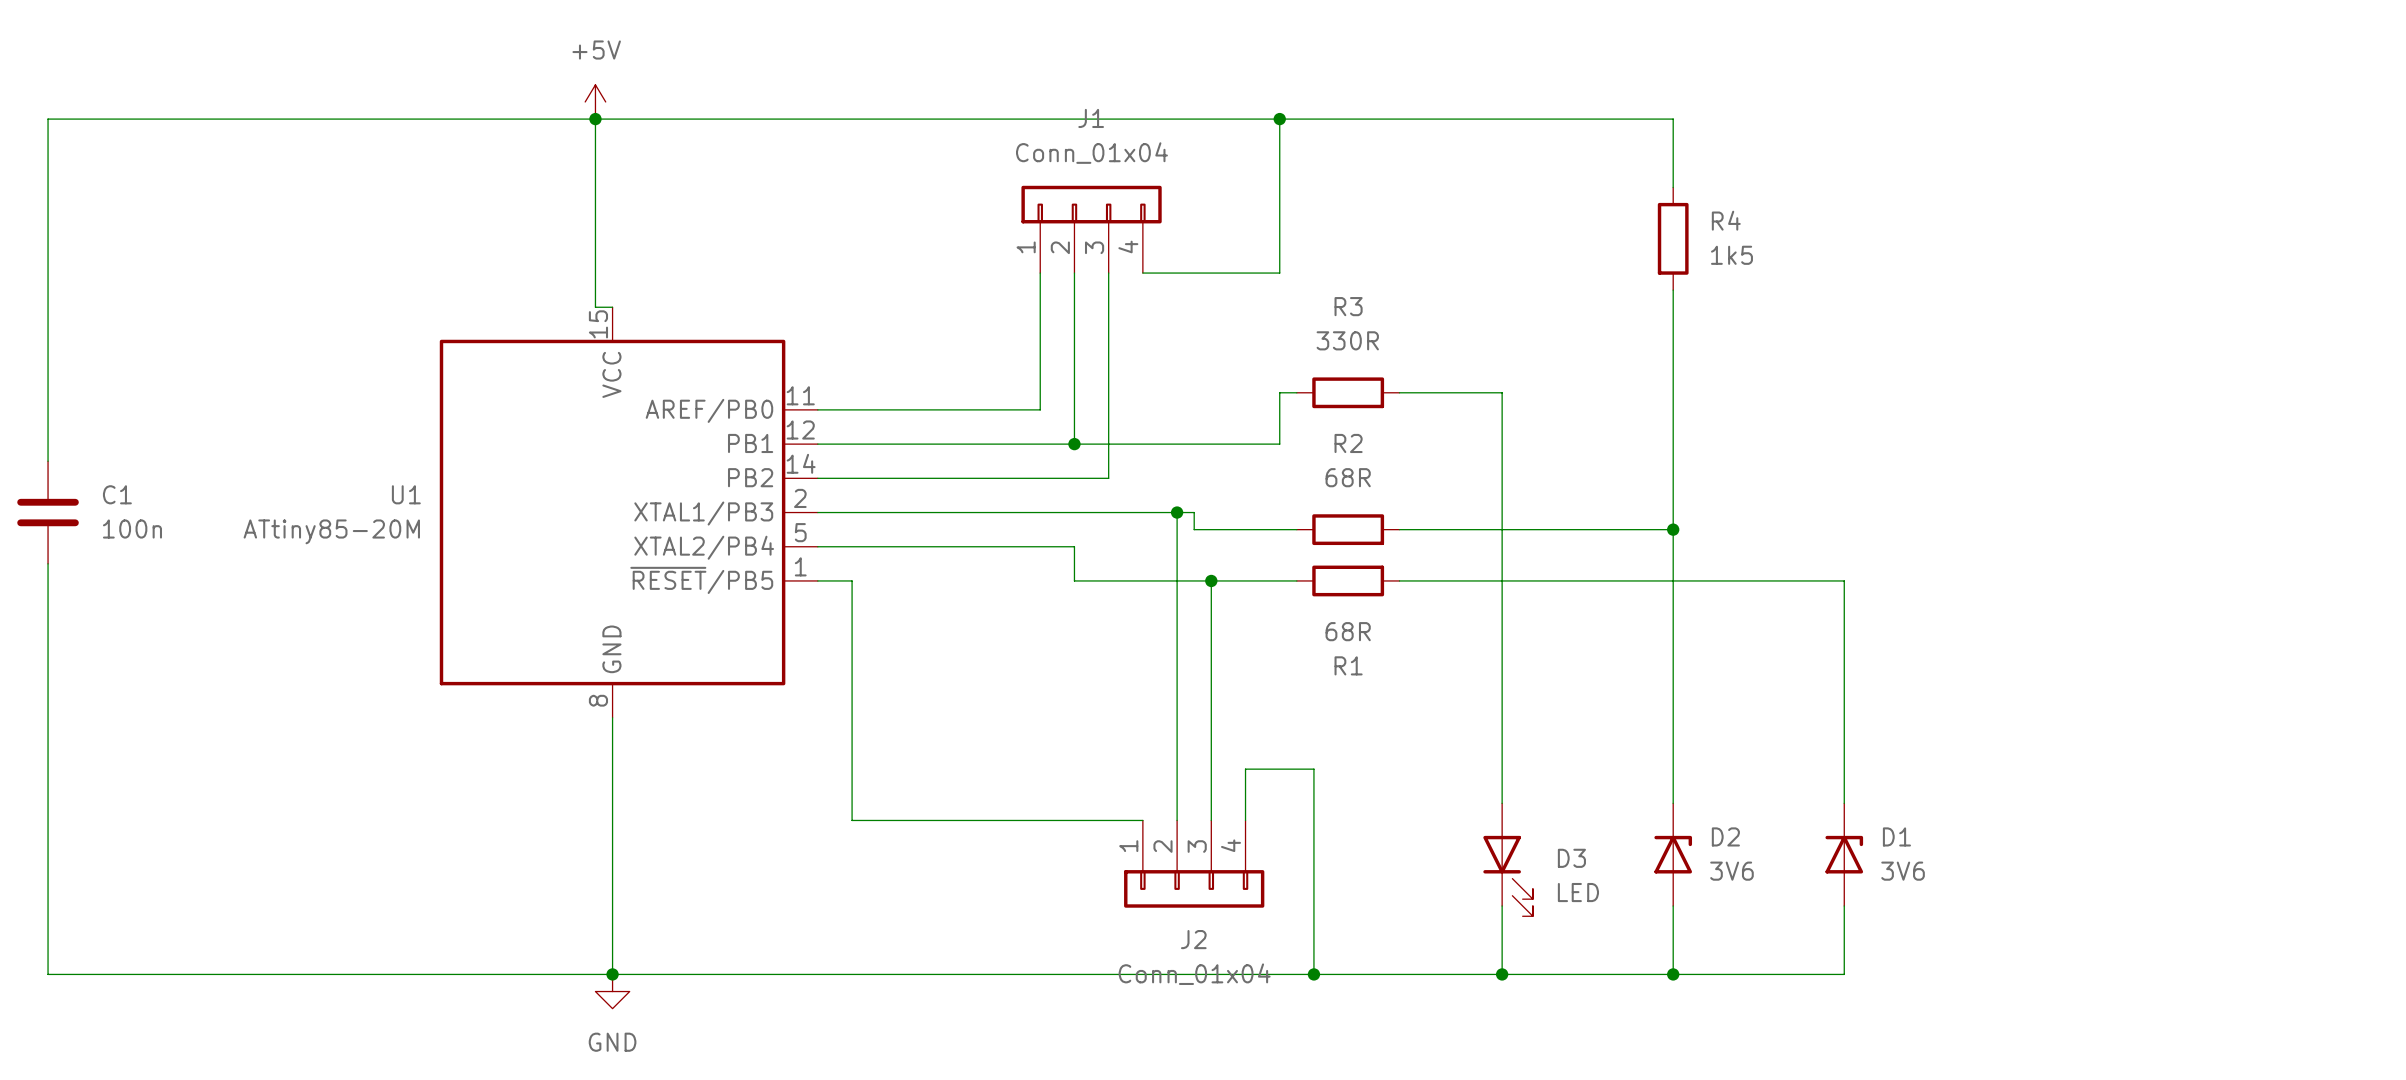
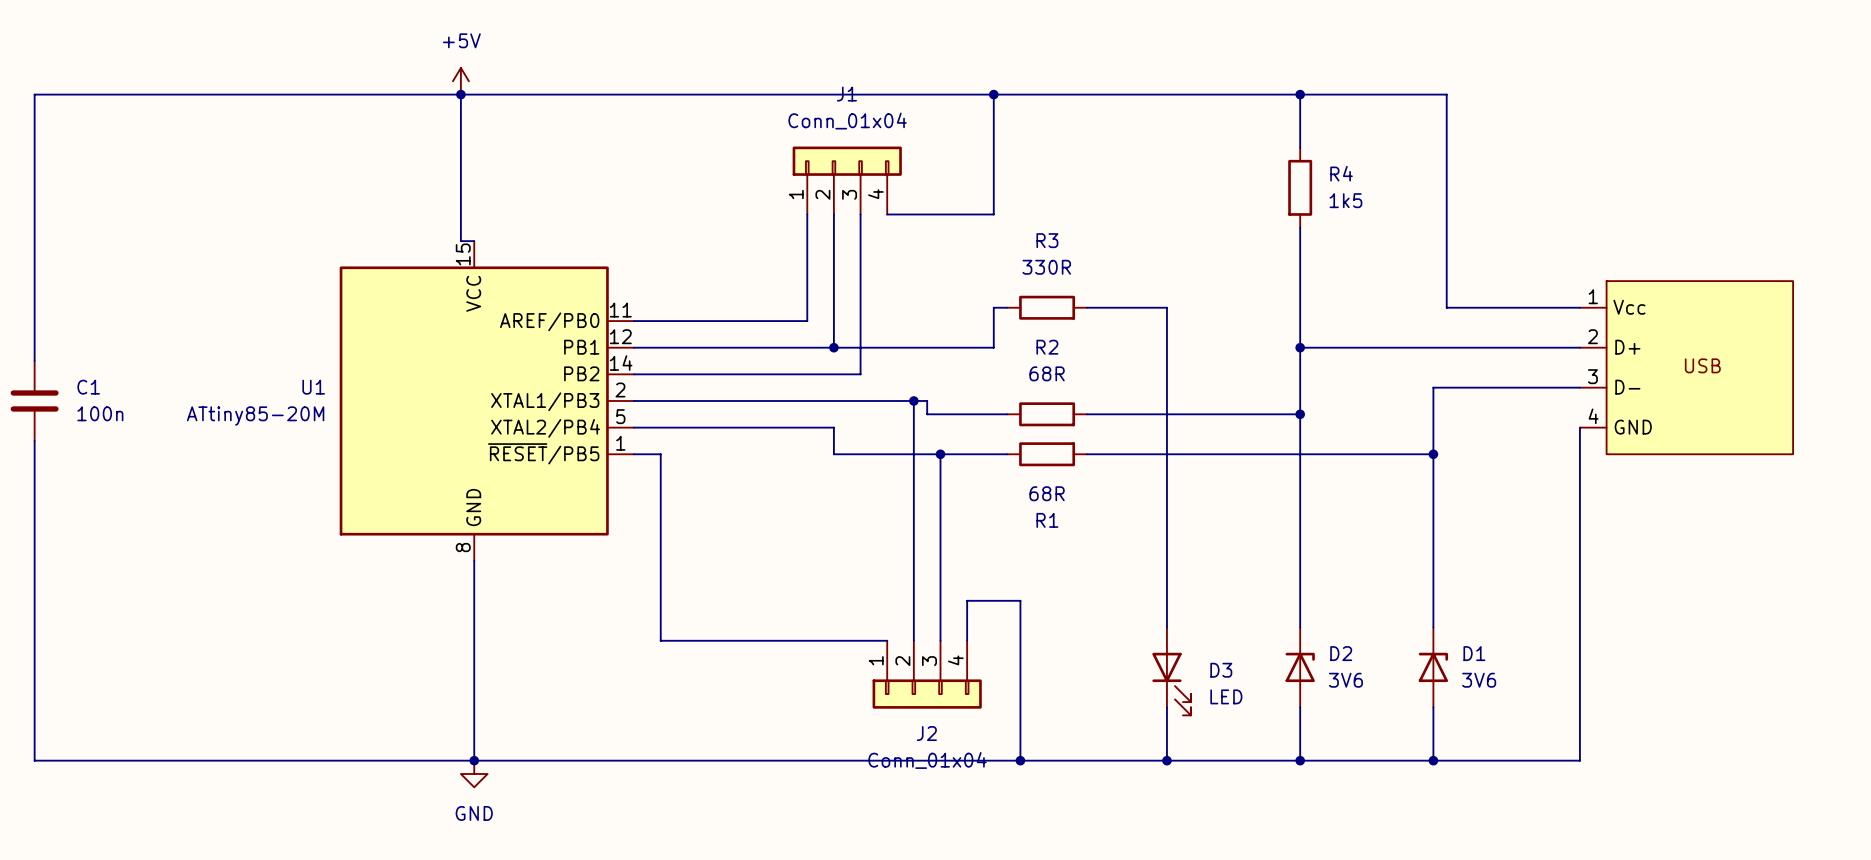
wire: none -> (1300, 94) (1446, 94) (1446, 307) (1579, 307)
junction: none -> (1300, 94)
wire: none -> (1300, 347) (1579, 347)
junction: none -> (1300, 347)
part: none -> (1686, 367)
wire: none -> (1579, 387) (1433, 387) (1433, 454)
wire: none -> (1579, 427) (1579, 760) (1433, 760)
junction: none -> (1433, 454)
junction: none -> (1433, 760)

